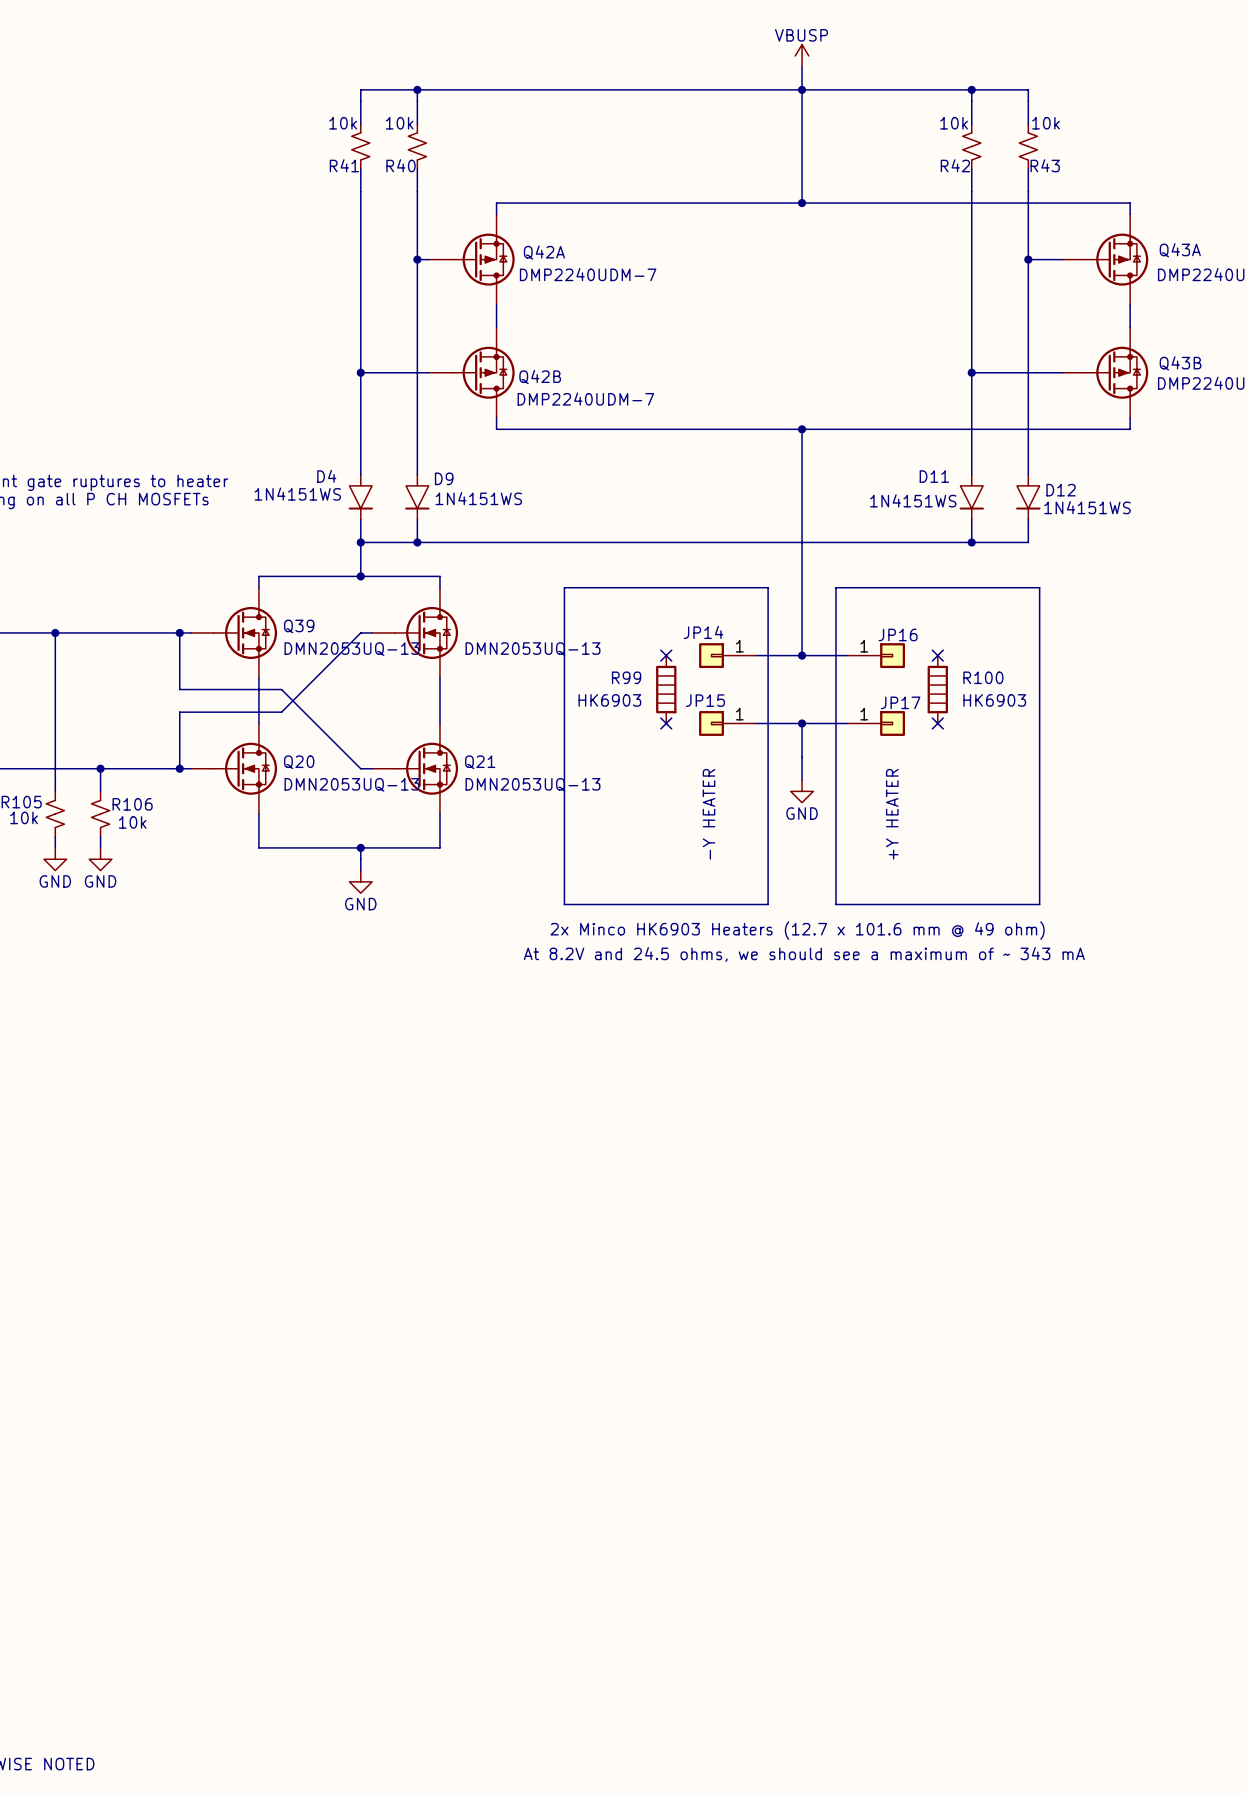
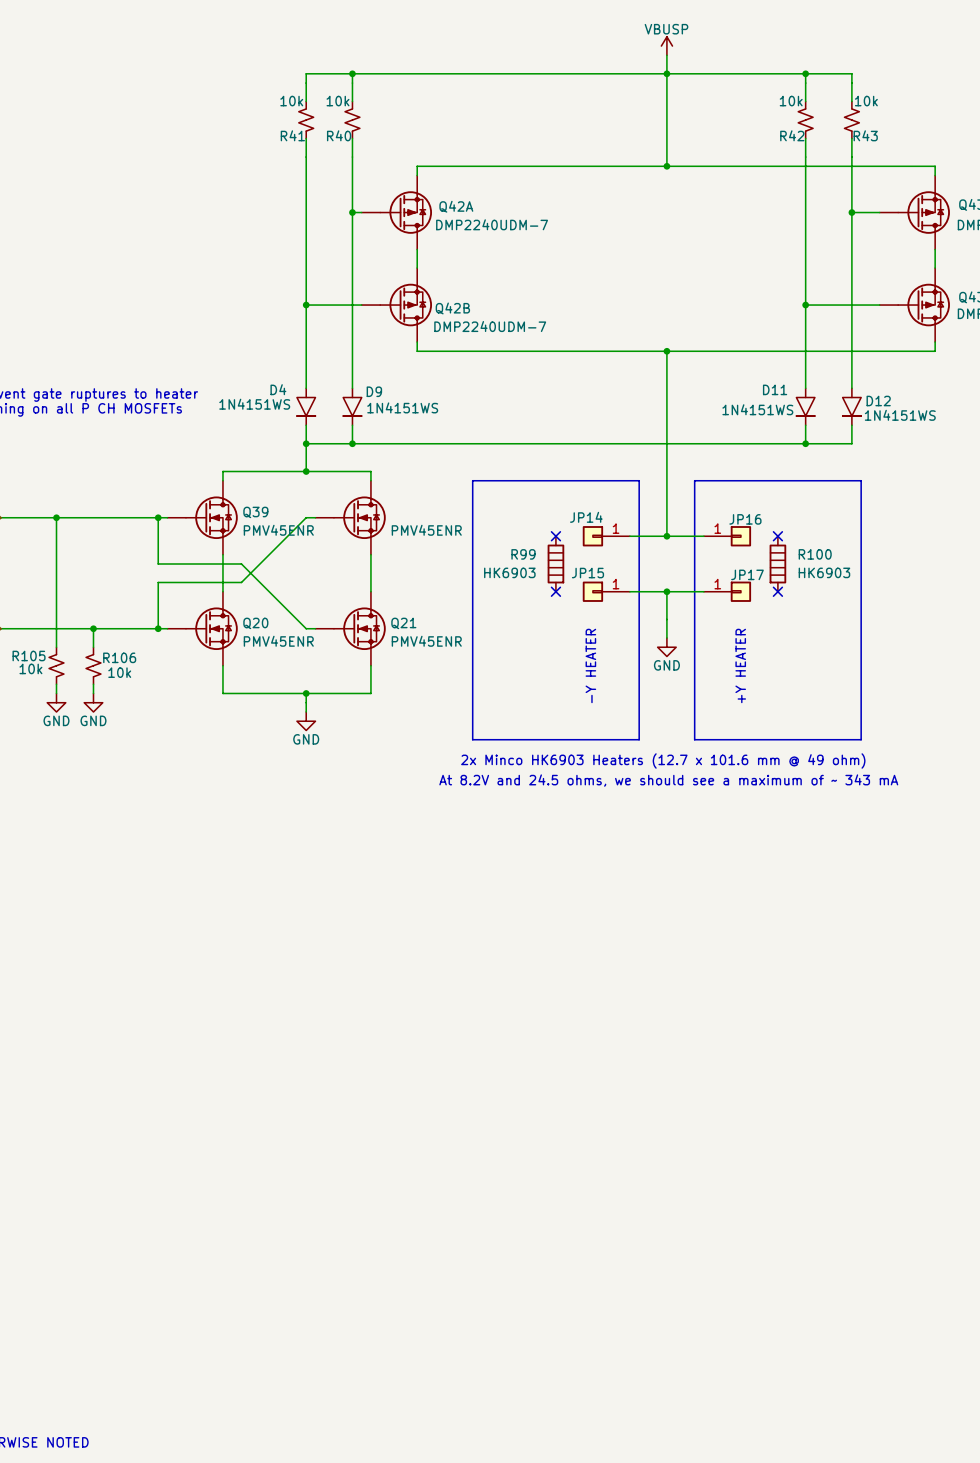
Q39 value: DMN2053UQ-13 (351, 649) -> PMV45ENR (278, 530)
part value: DMN2053UQ-13 (533, 649) -> PMV45ENR (426, 530)
Q20 value: DMN2053UQ-13 (351, 784) -> PMV45ENR (278, 641)
Q21 value: DMN2053UQ-13 (533, 784) -> PMV45ENR (426, 641)

